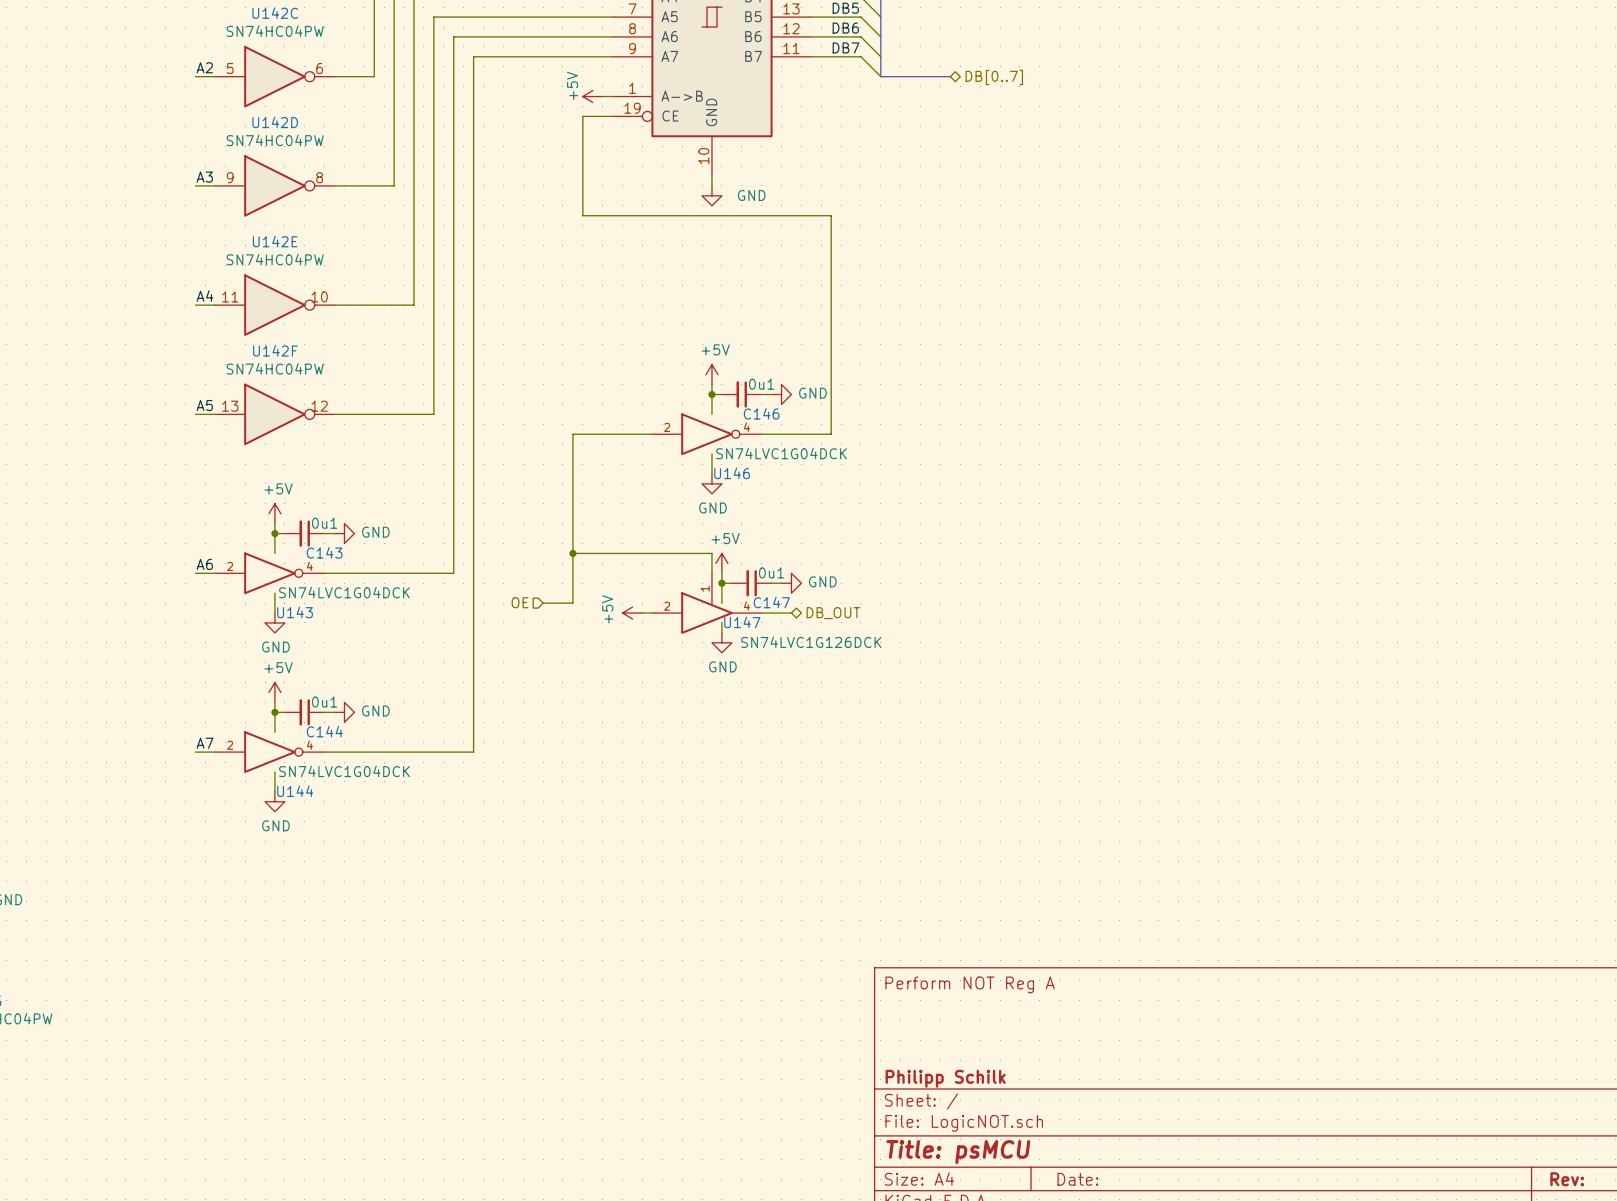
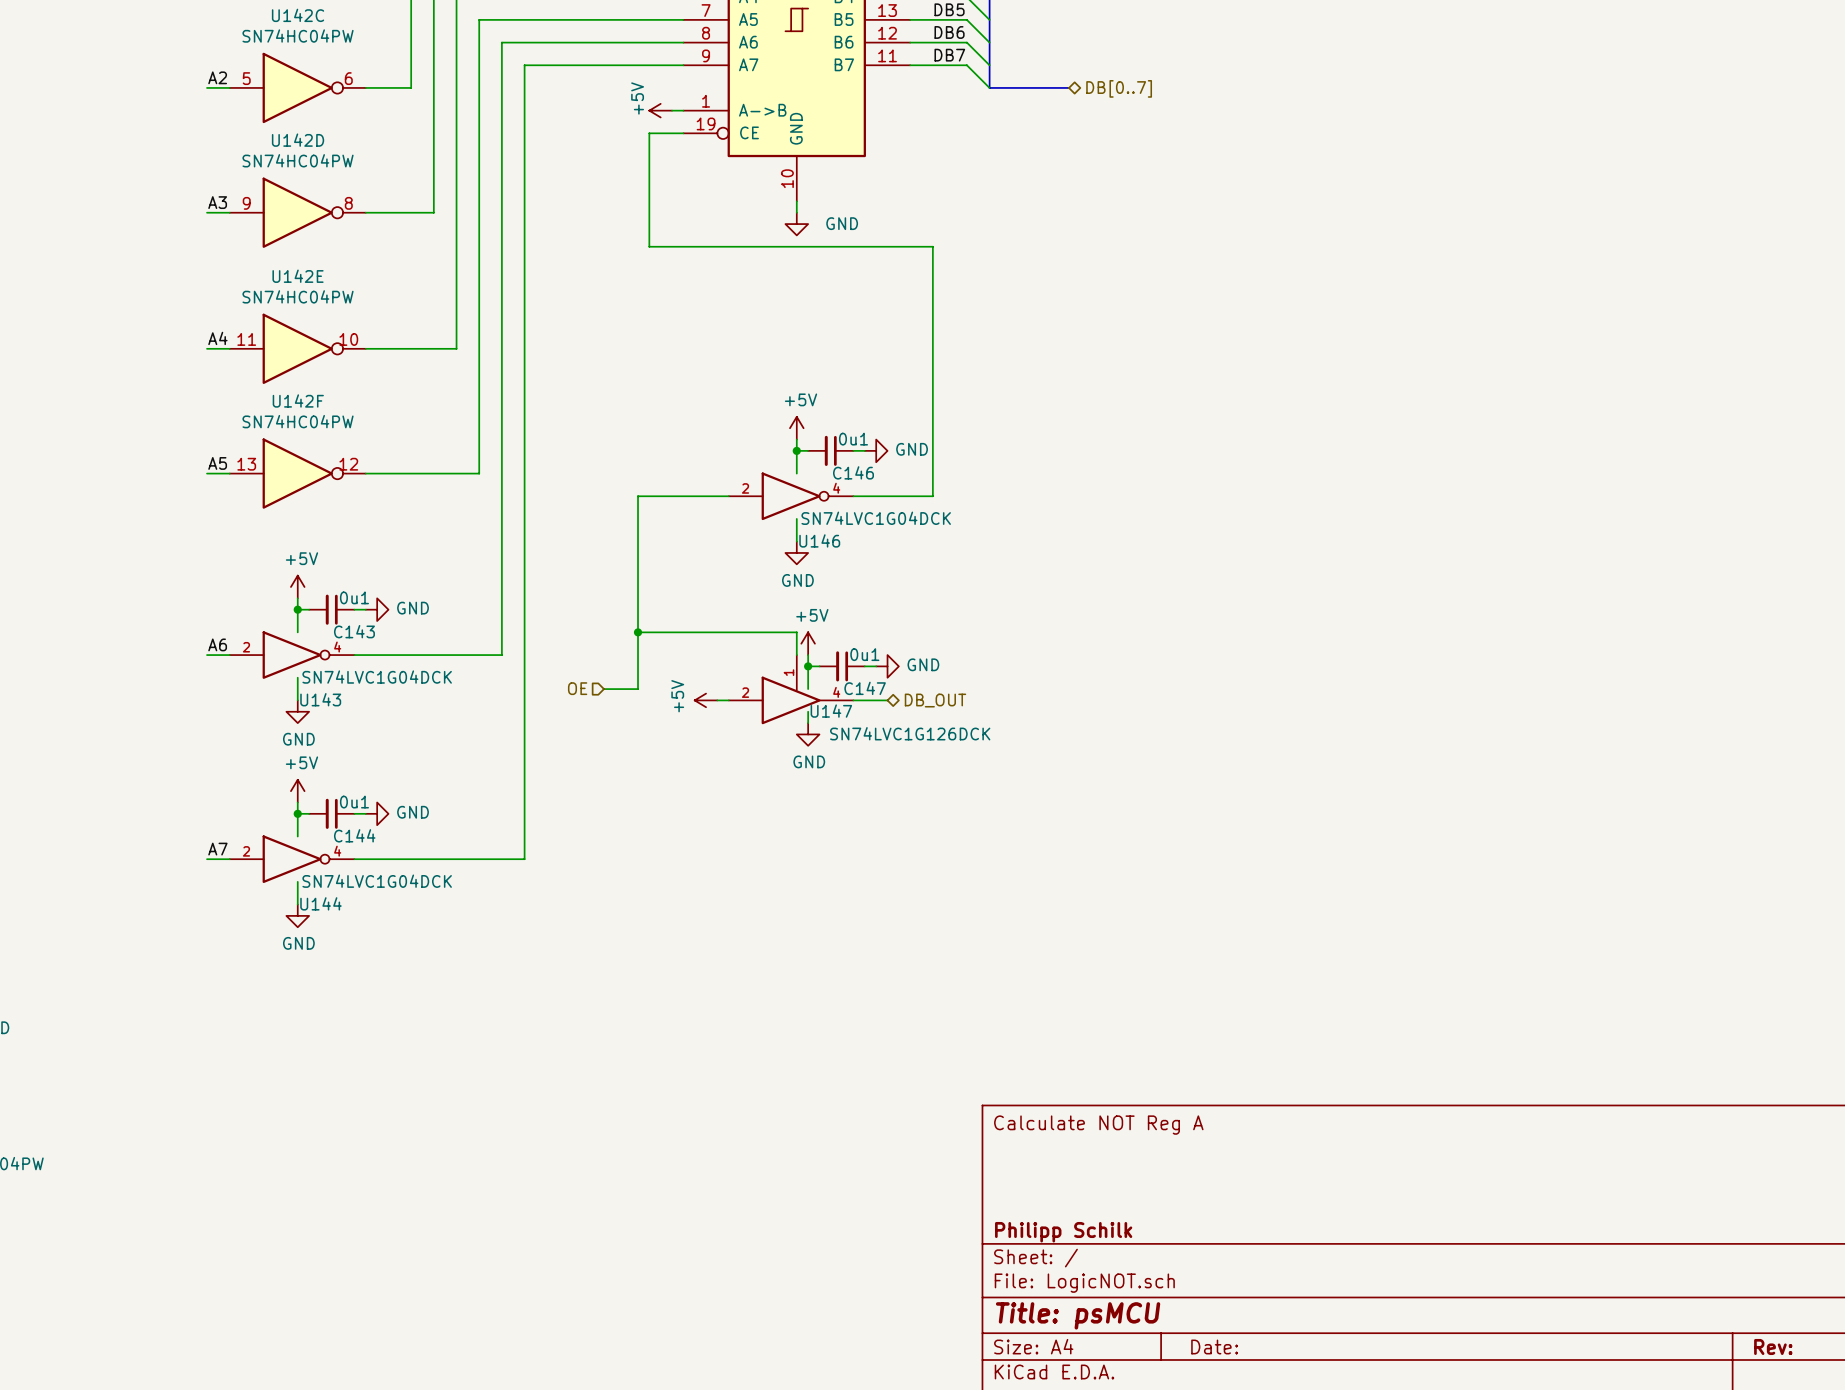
title block: Perform NOT Reg A (970, 984) -> Calculate NOT Reg A (1098, 1125)

